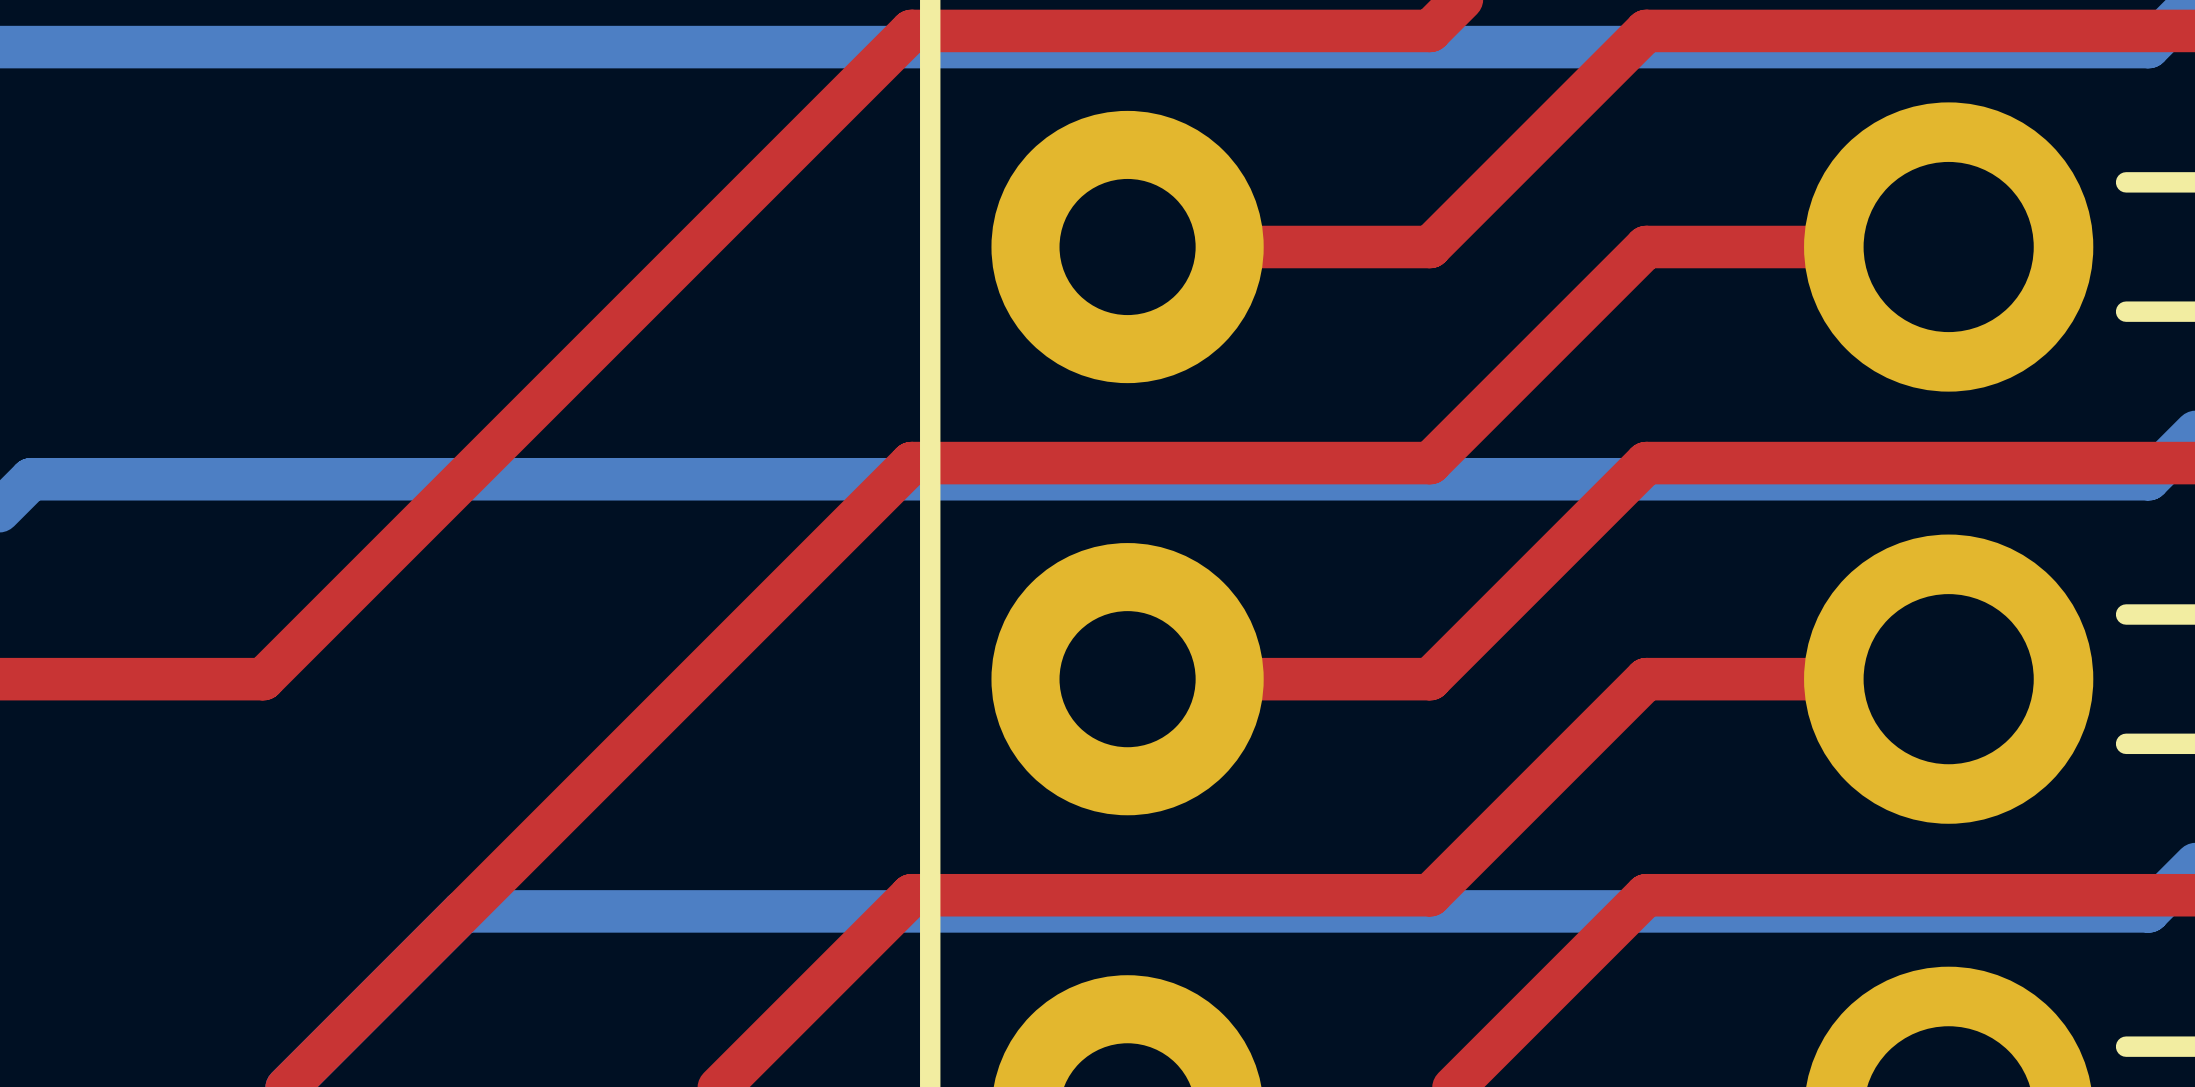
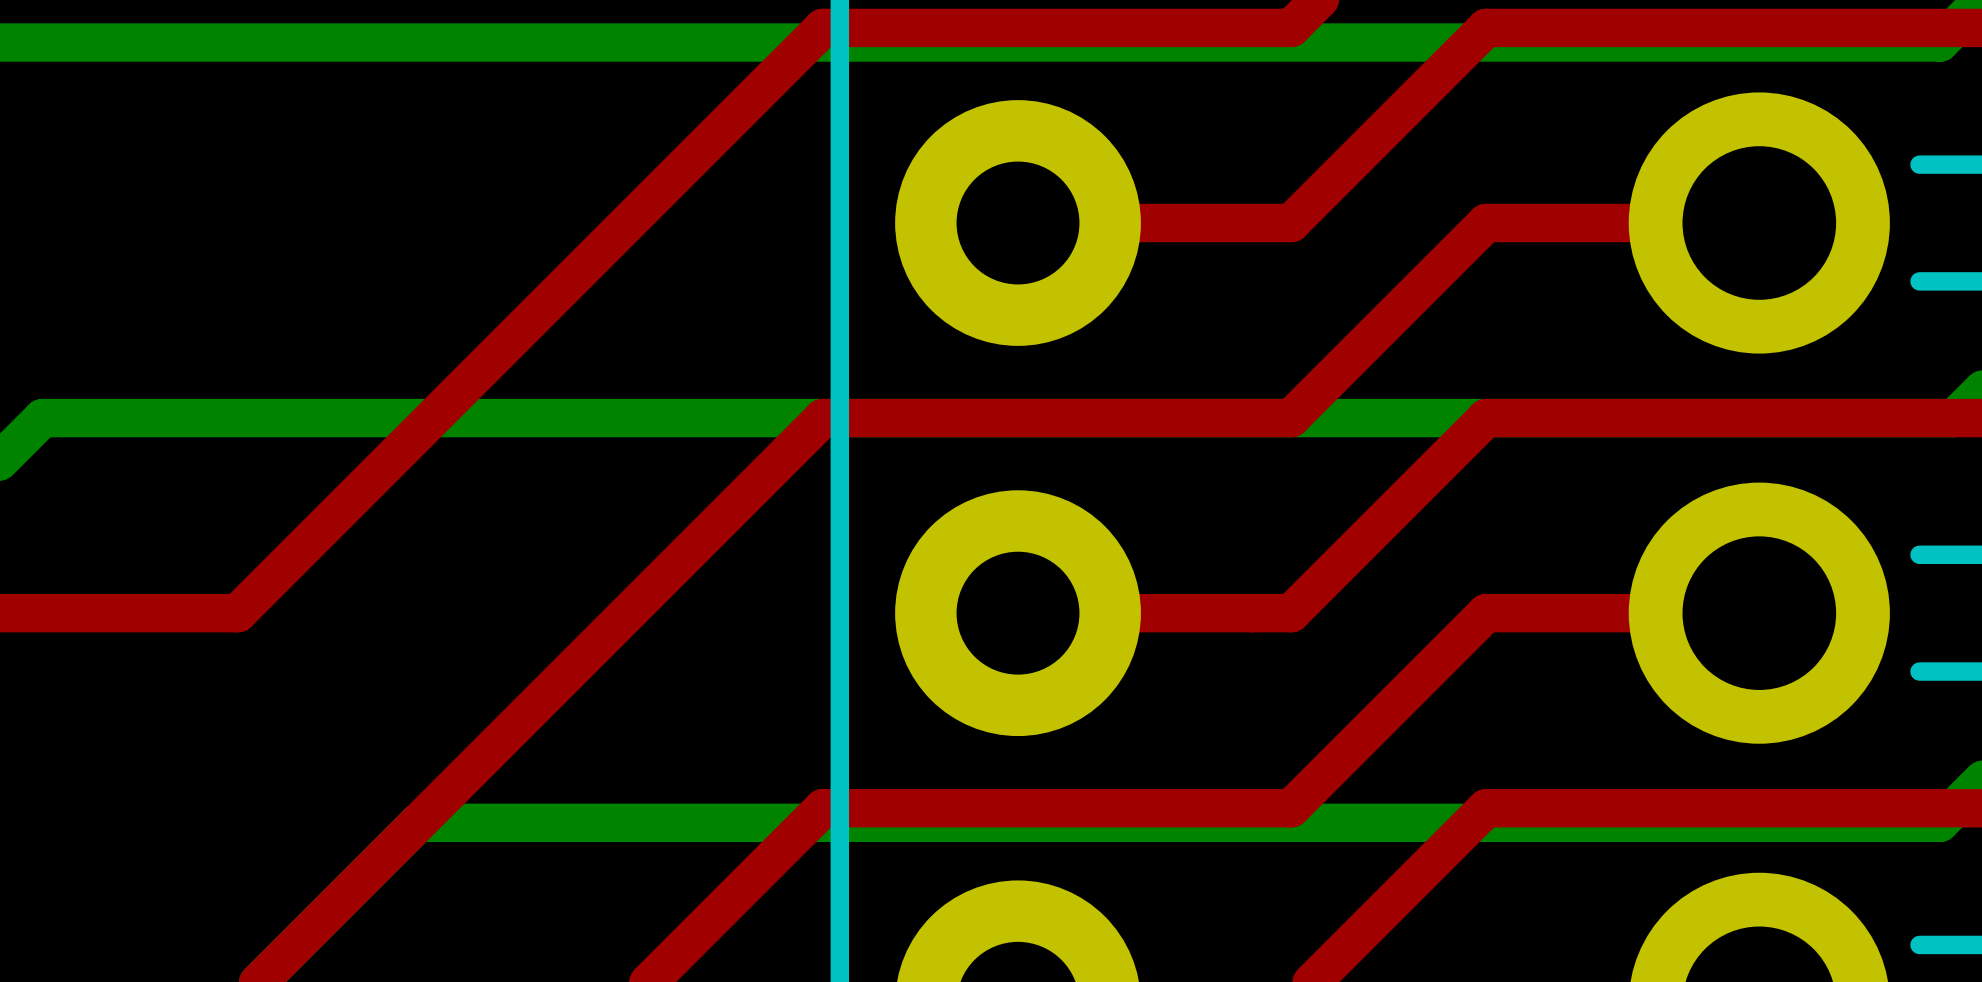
bottom track: (2164, 463) (2148, 479) (31, 479) -> (1954, 418) (42, 418) (28, 432)

